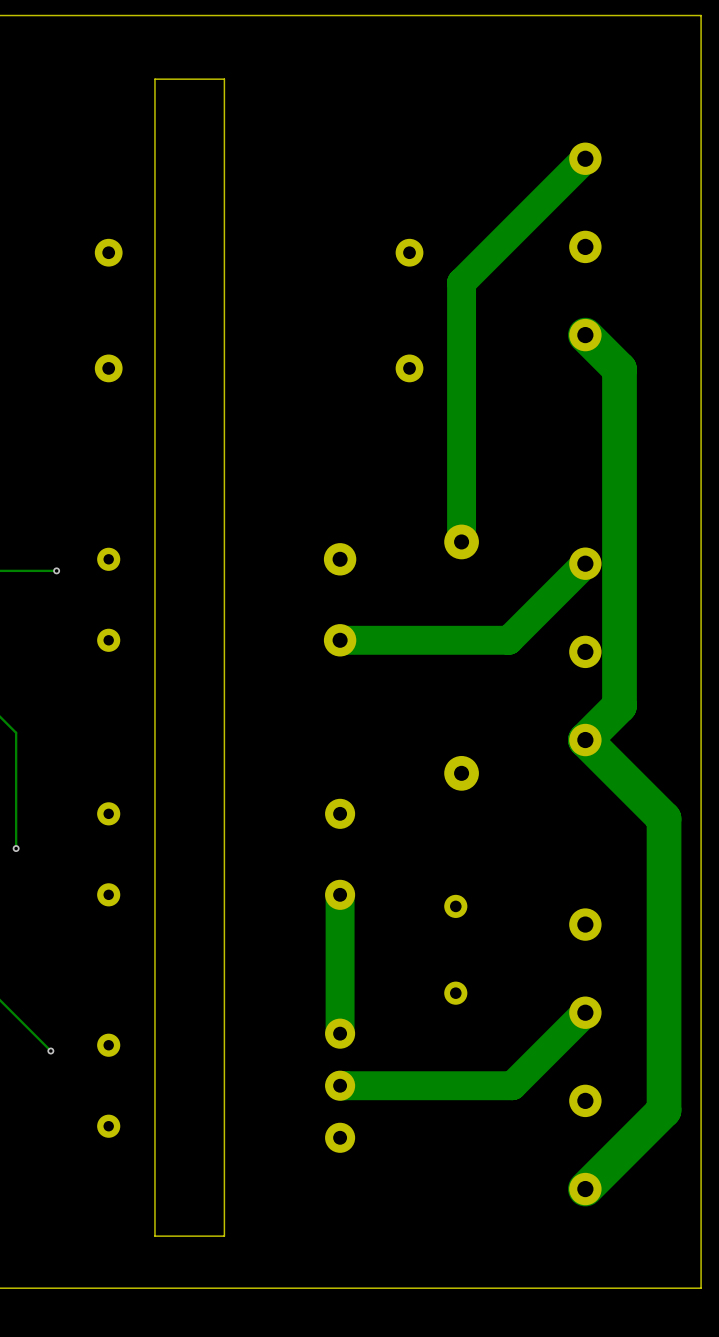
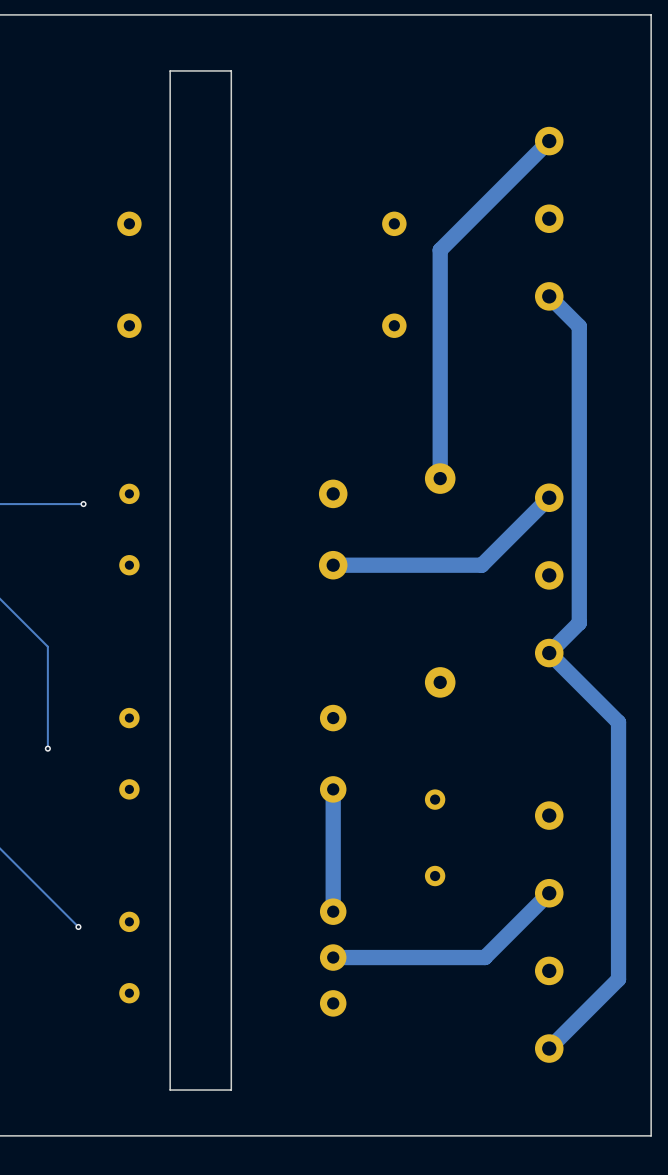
track width: thick (585, 158) (461, 282) (461, 541) -> thin (549, 141) (440, 250) (440, 478)
track width: thick (585, 335) (619, 369) (619, 705) (585, 740) (664, 818) (664, 1110) (585, 1189) -> thin (549, 296) (579, 326) (579, 622) (549, 653) (618, 722) (618, 979) (549, 1048)
track width: thick (585, 563) (508, 640) (340, 640) -> thin (549, 497) (481, 565) (333, 565)
track width: thick (340, 894) (340, 1033) -> thin (333, 789) (333, 911)
track width: thick (585, 1012) (512, 1085) (340, 1085) -> thin (549, 893) (484, 957) (333, 957)

